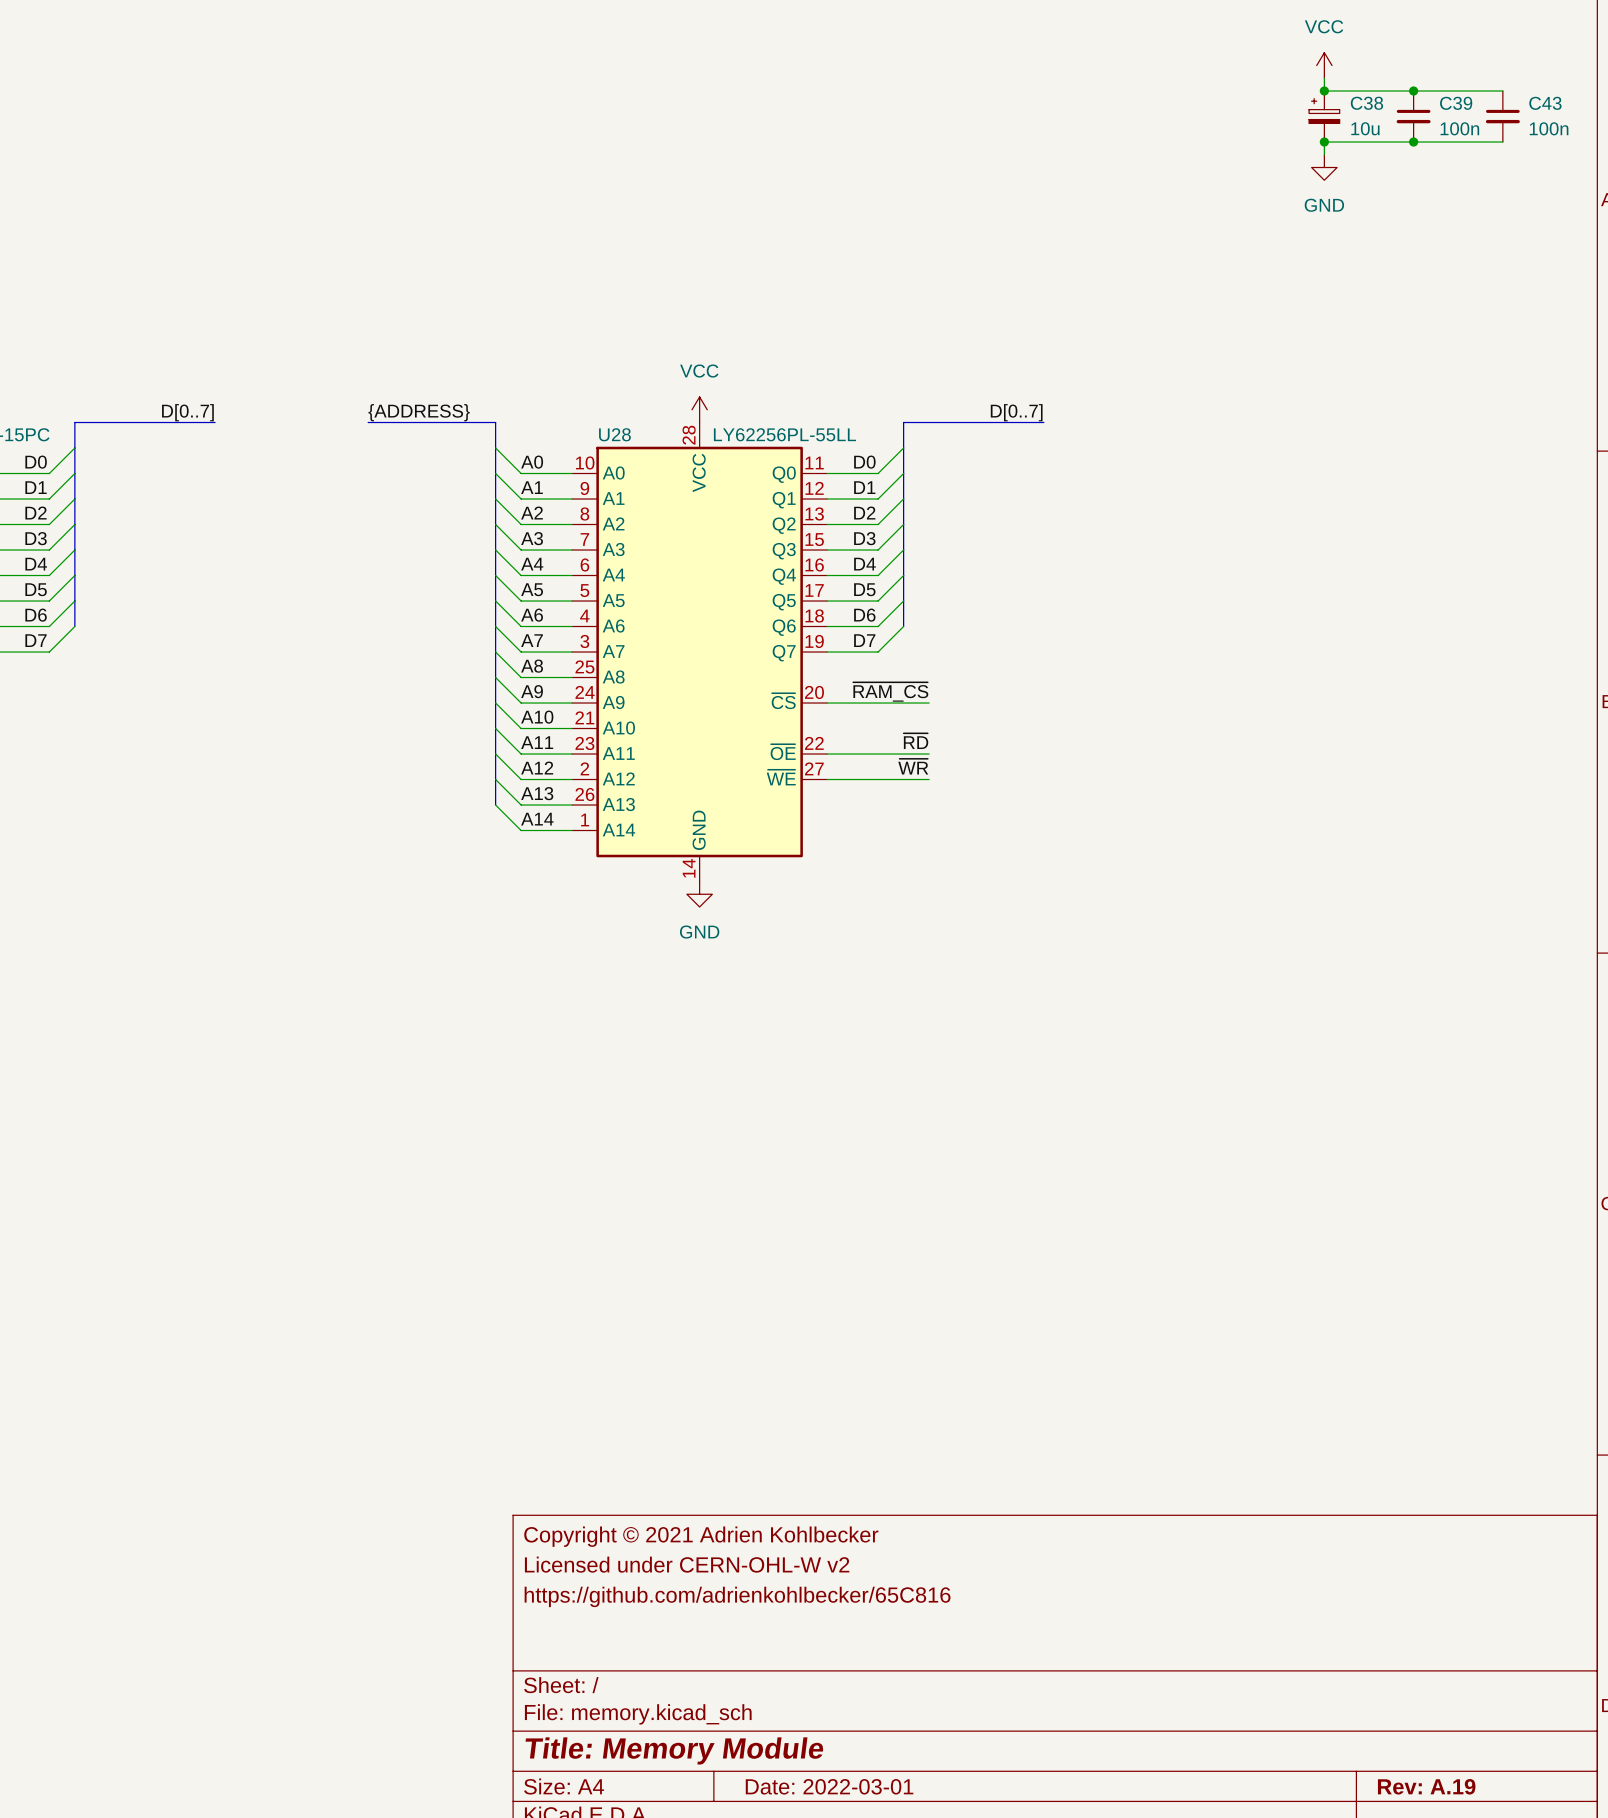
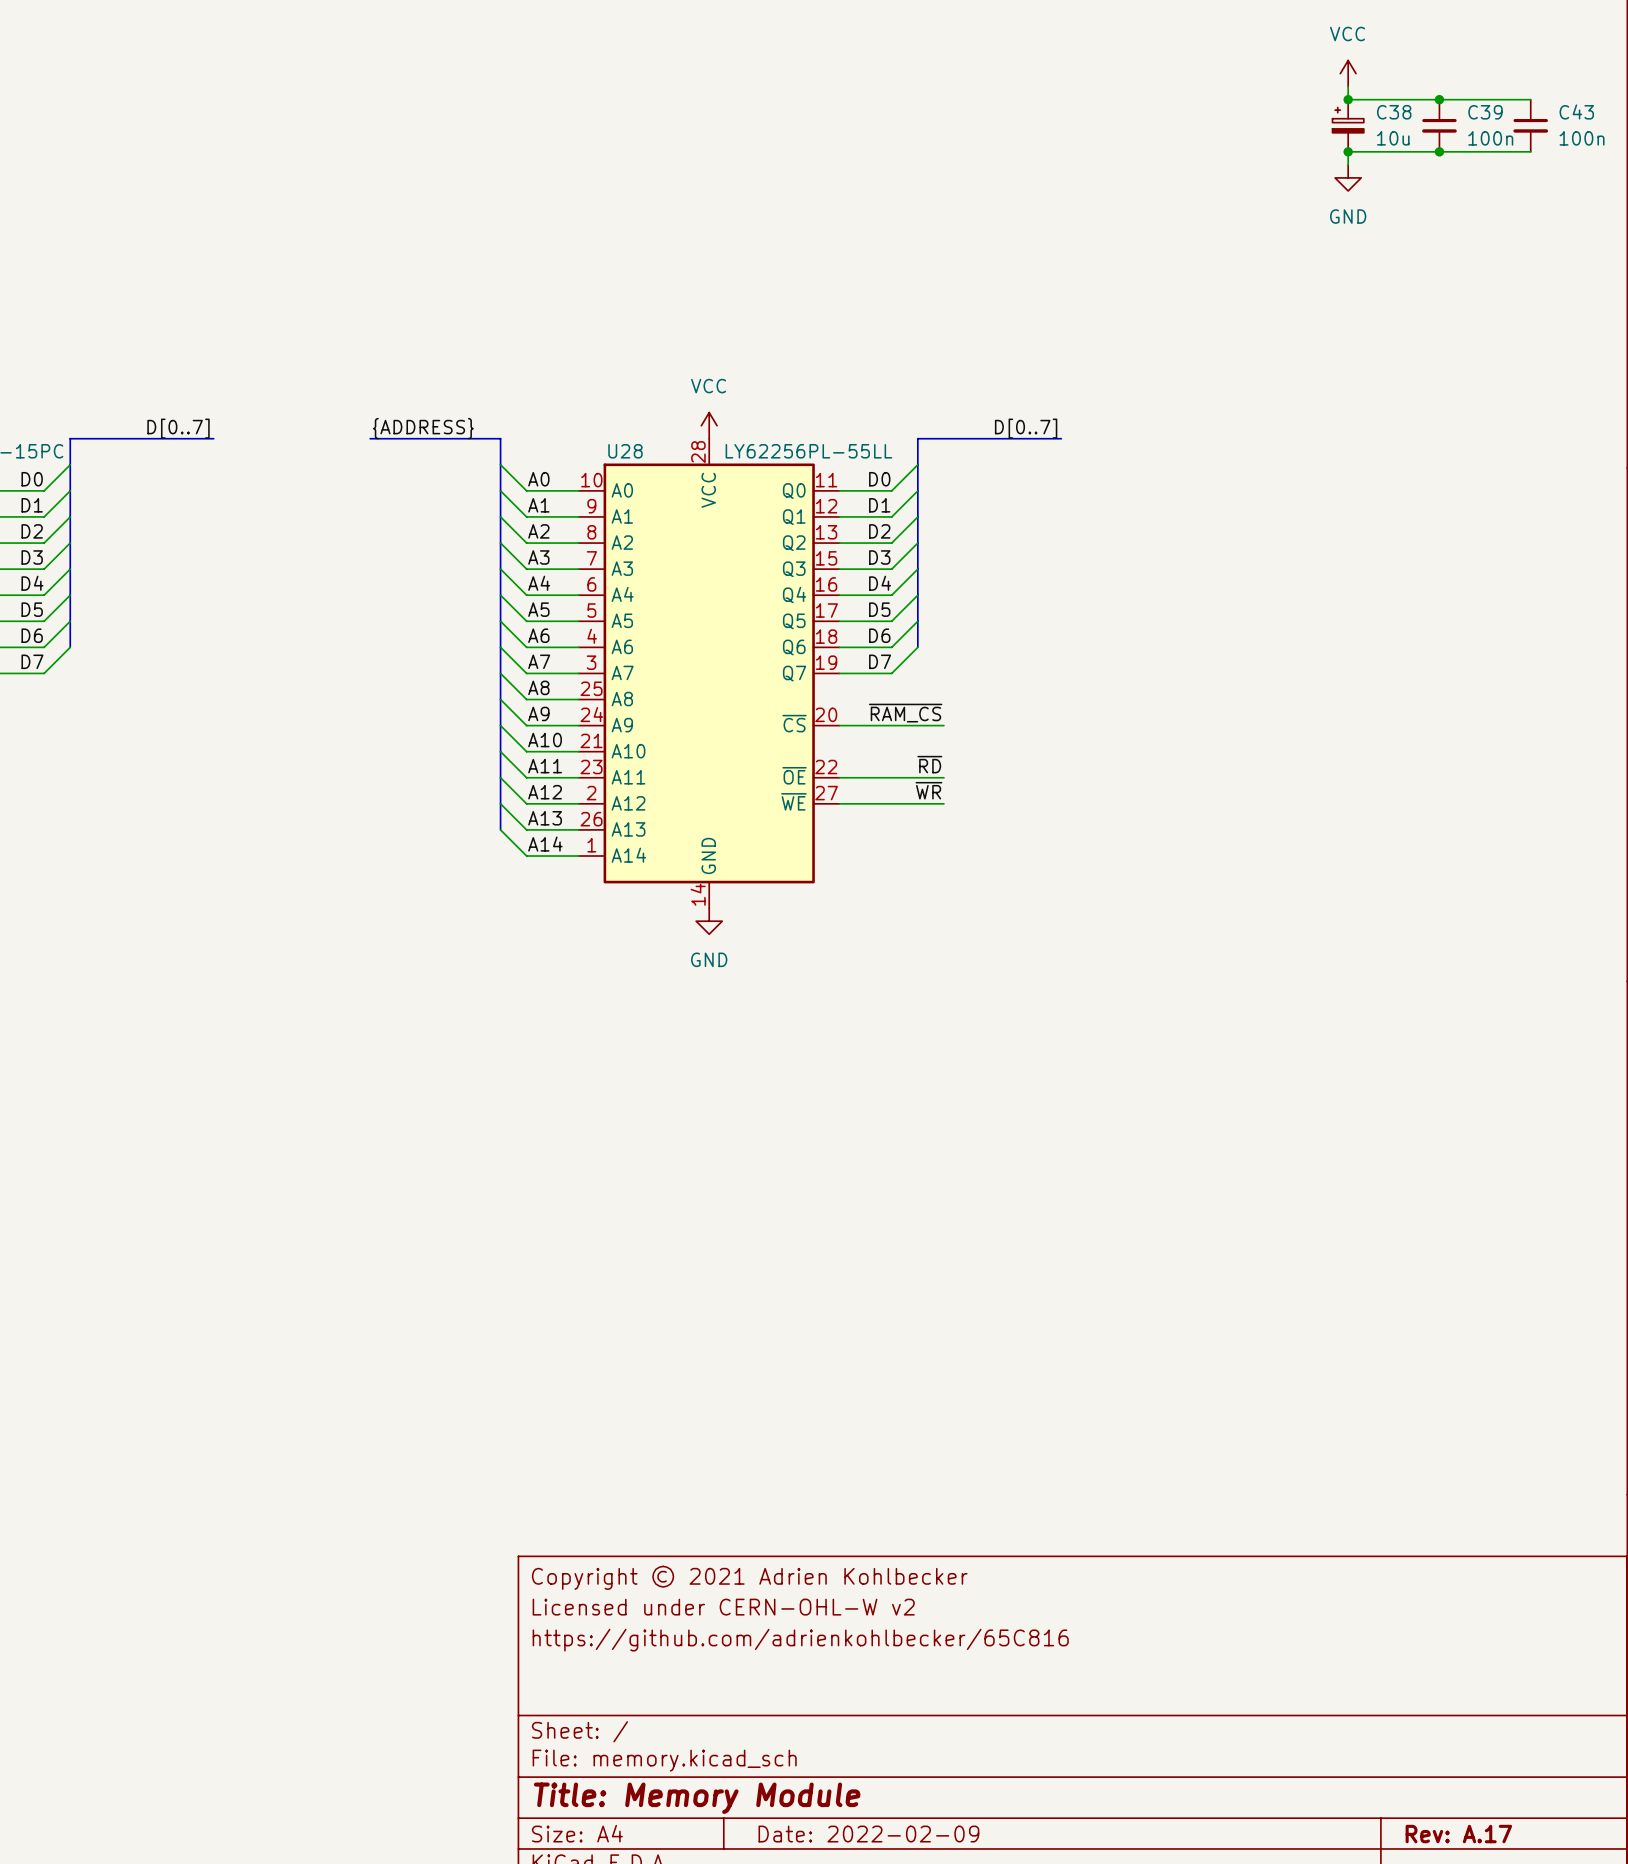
title block: Date: 2022-03-01 (829, 1786) -> Date: 2022-02-09 (868, 1834)
title block: Rev: A.19 (1426, 1786) -> Rev: A.17 (1458, 1834)

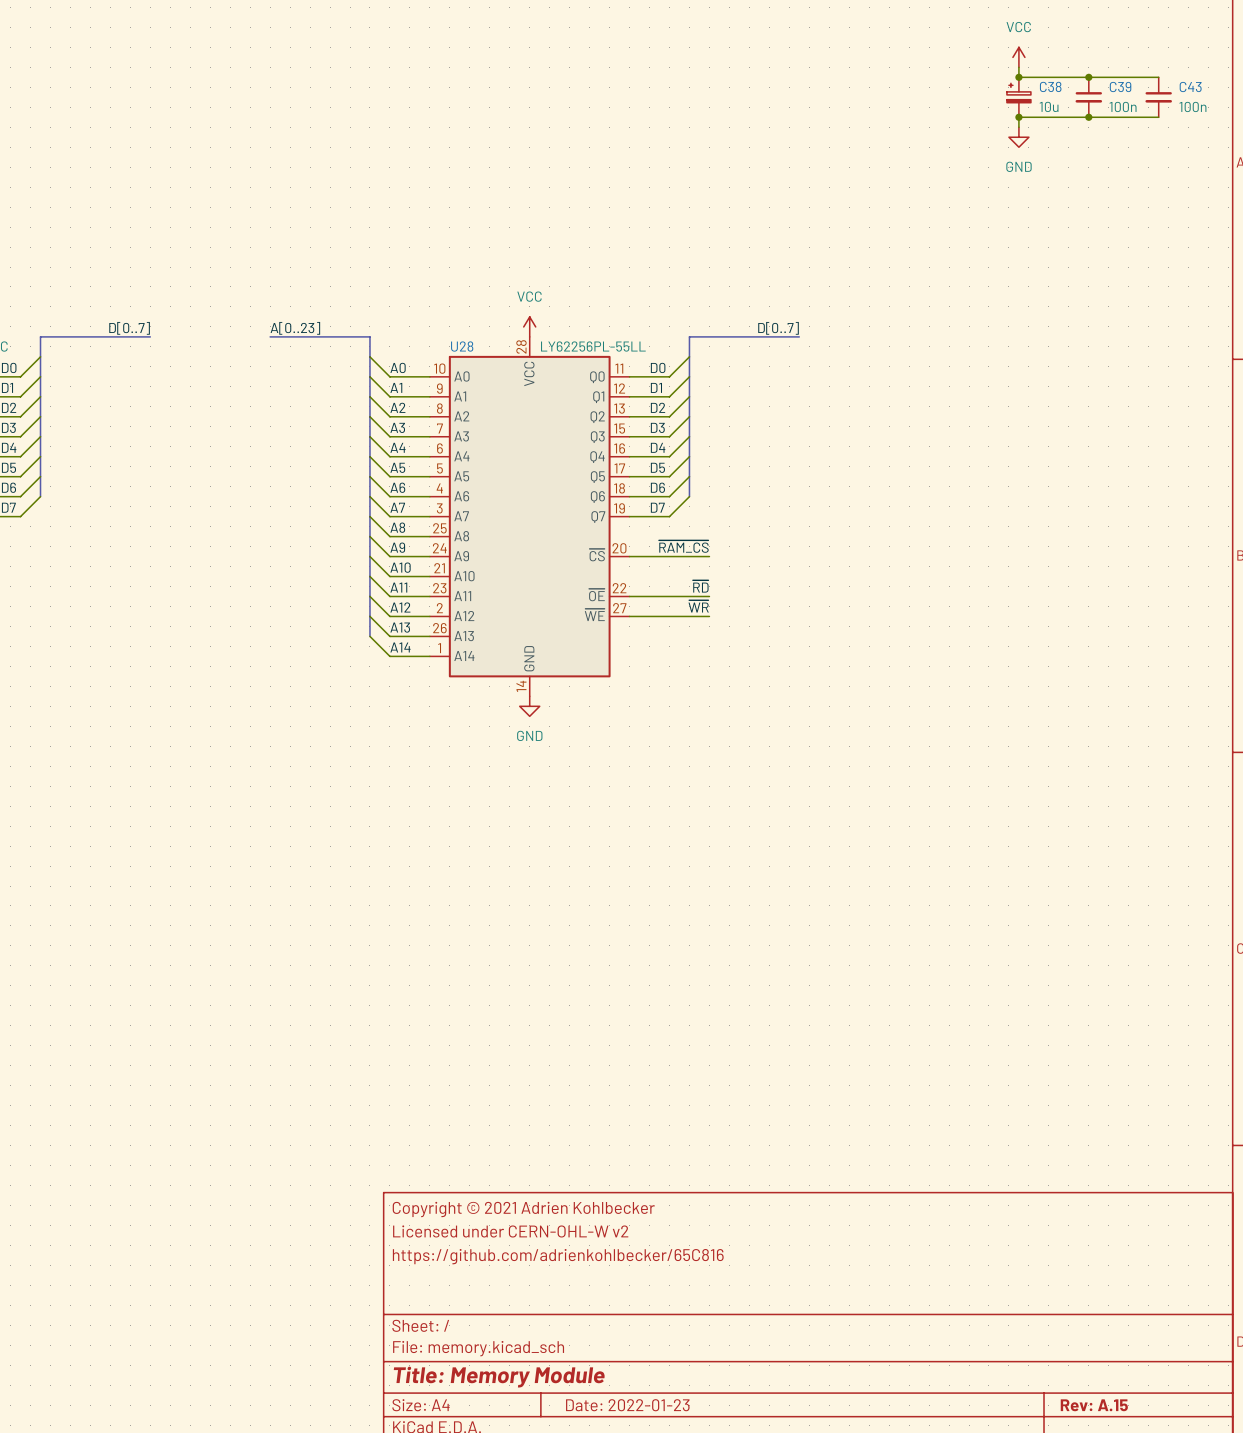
label: {ADDRESS} (423, 428) -> A[0..23] (295, 328)
title block: Date: 2022-02-09 (868, 1834) -> Date: 2022-01-23 (627, 1405)
title block: Rev: A.17 (1458, 1834) -> Rev: A.15 (1094, 1405)

